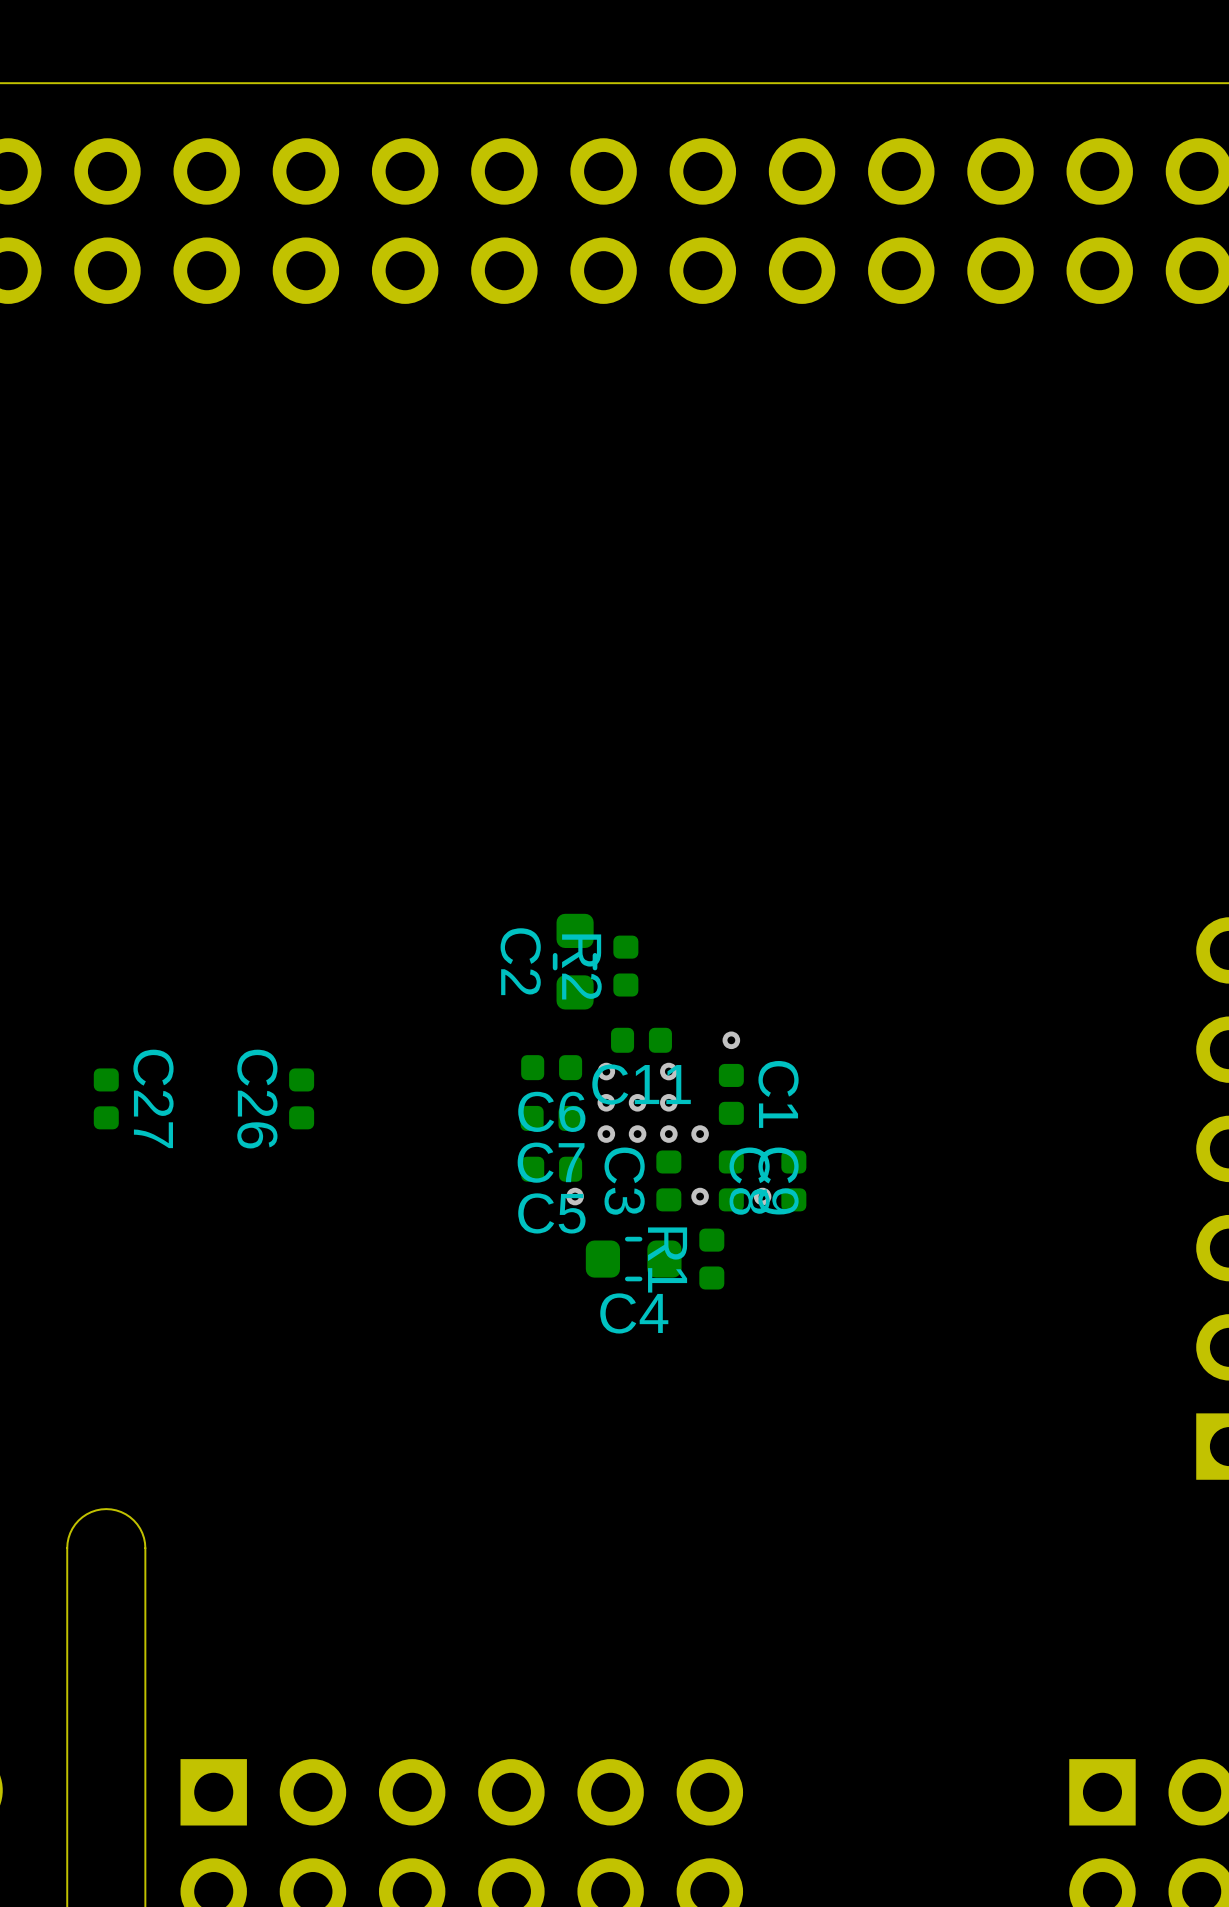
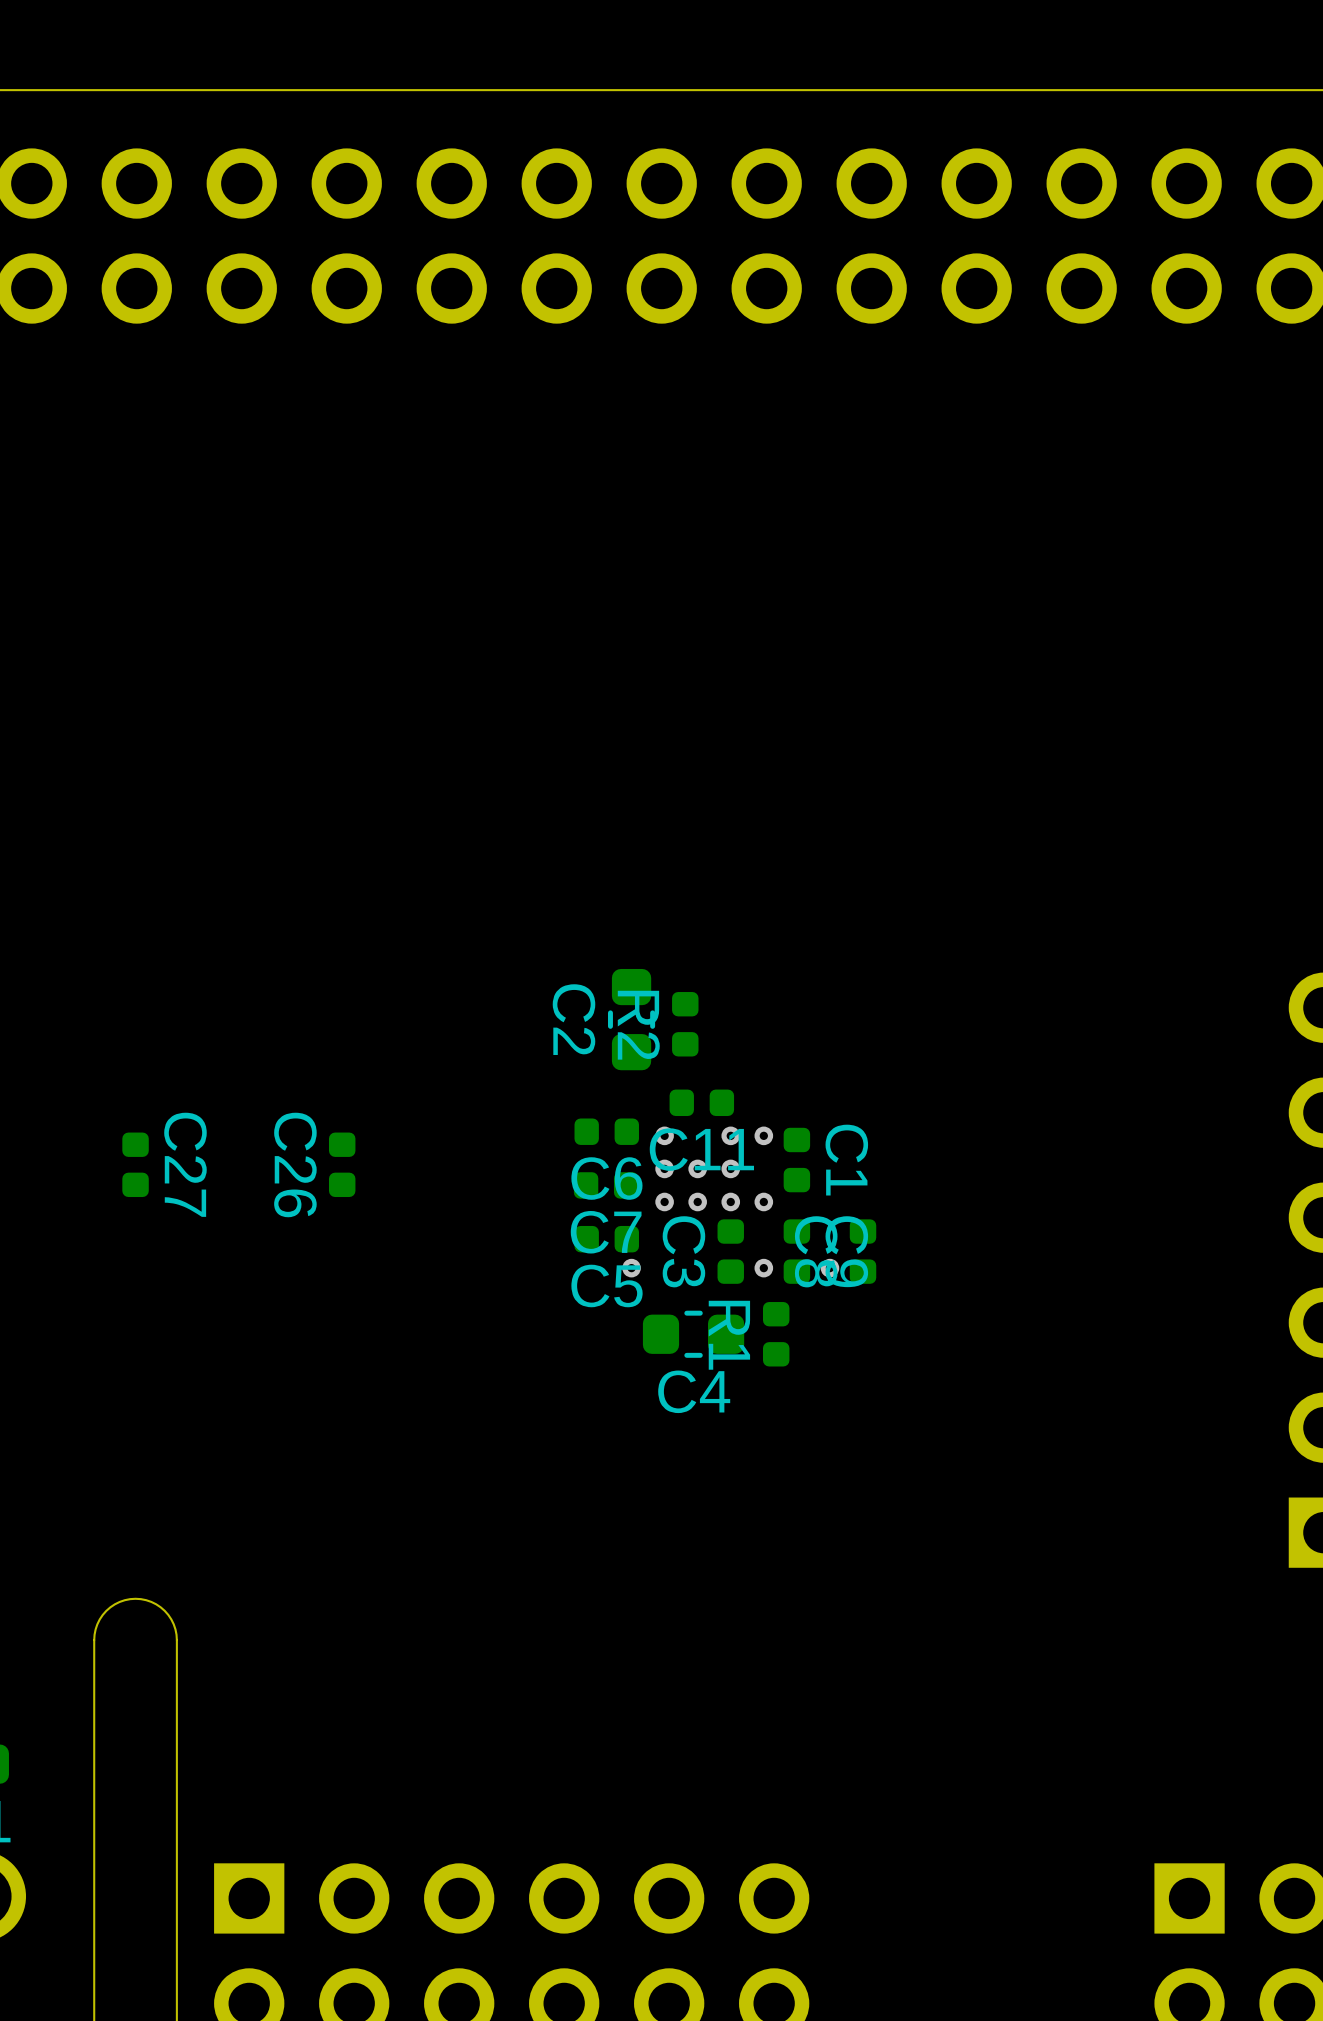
via position: (731, 1040) -> (763, 1135)

